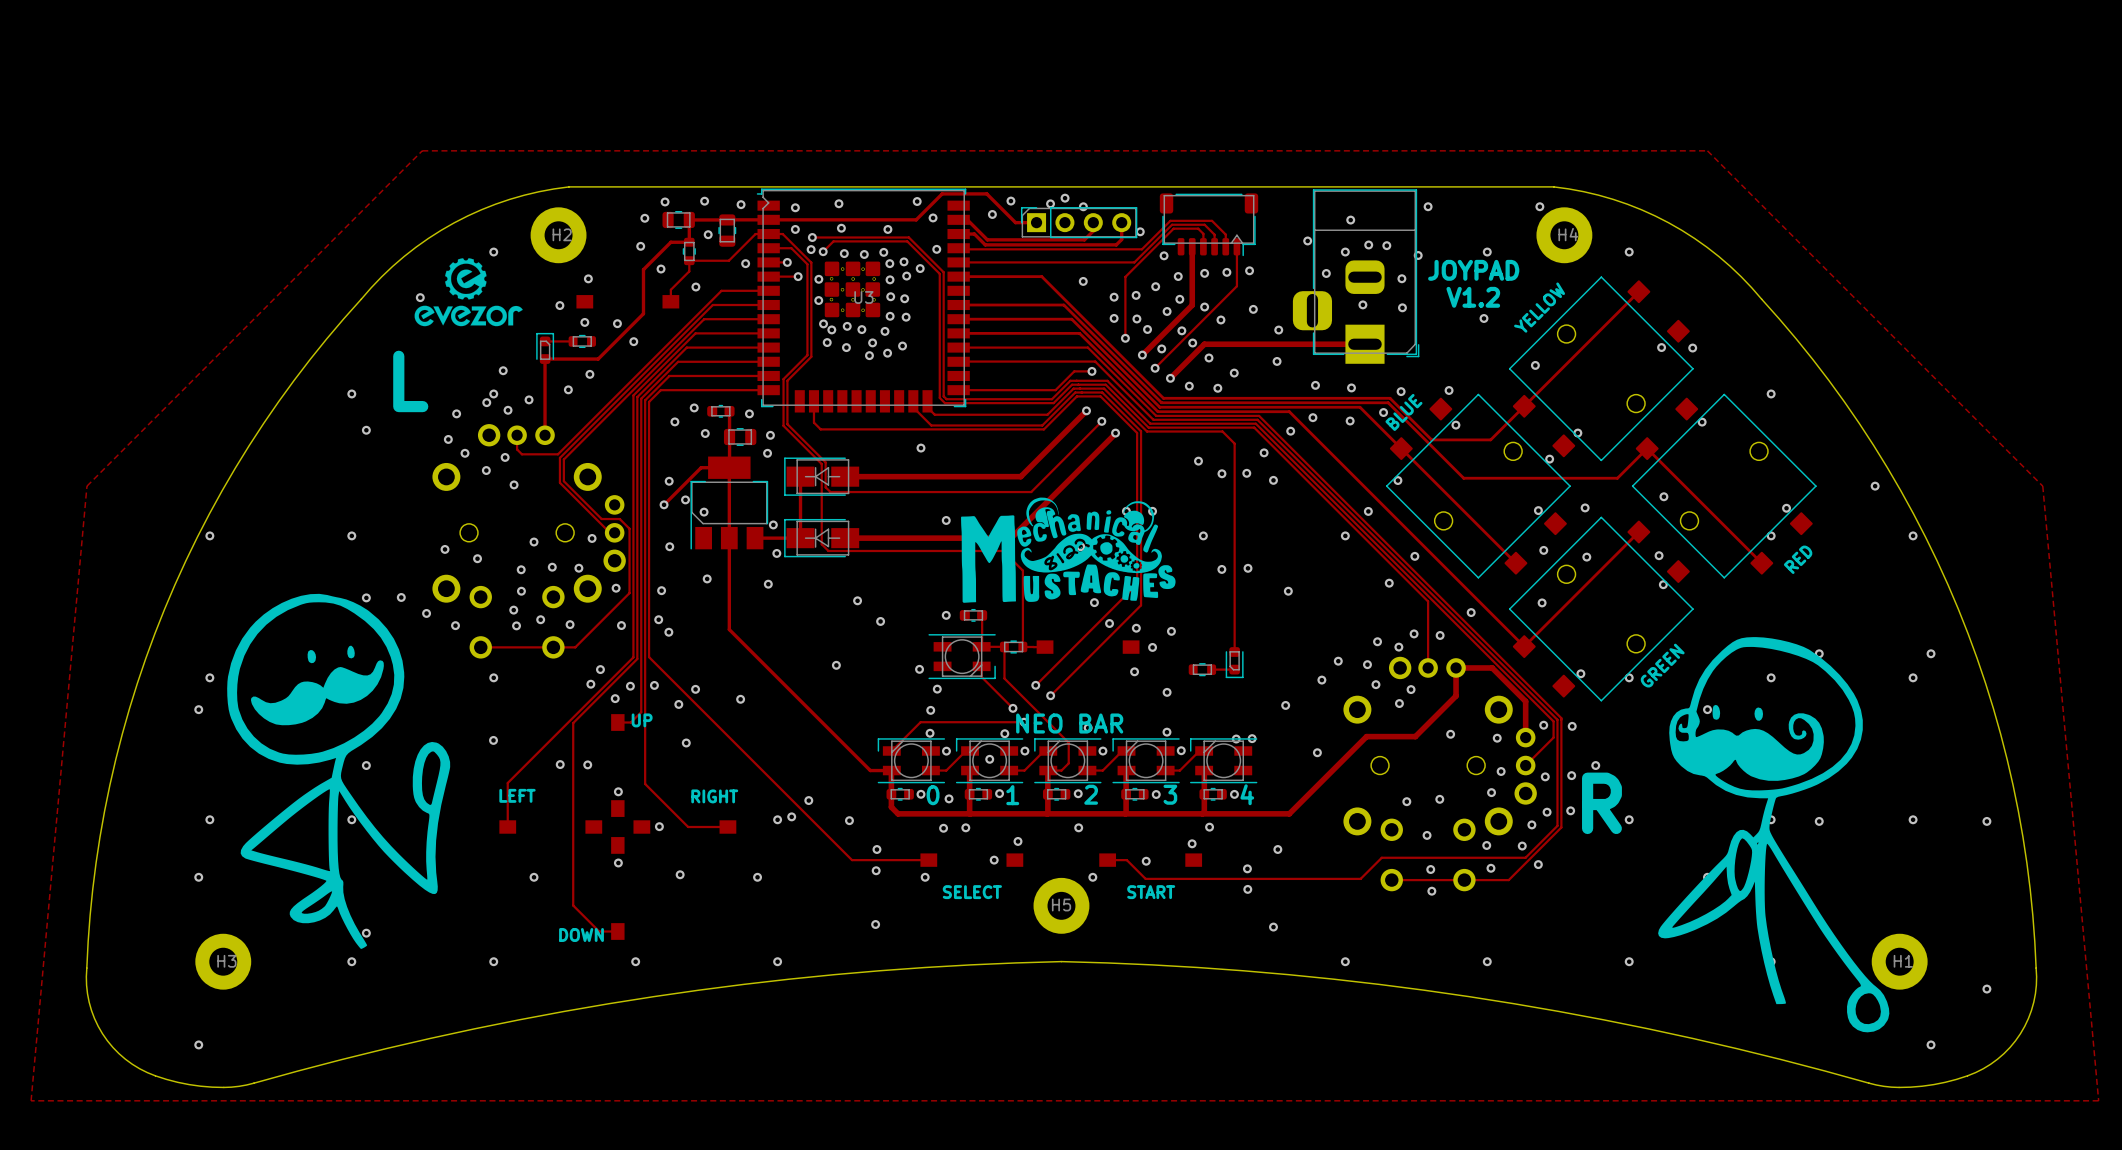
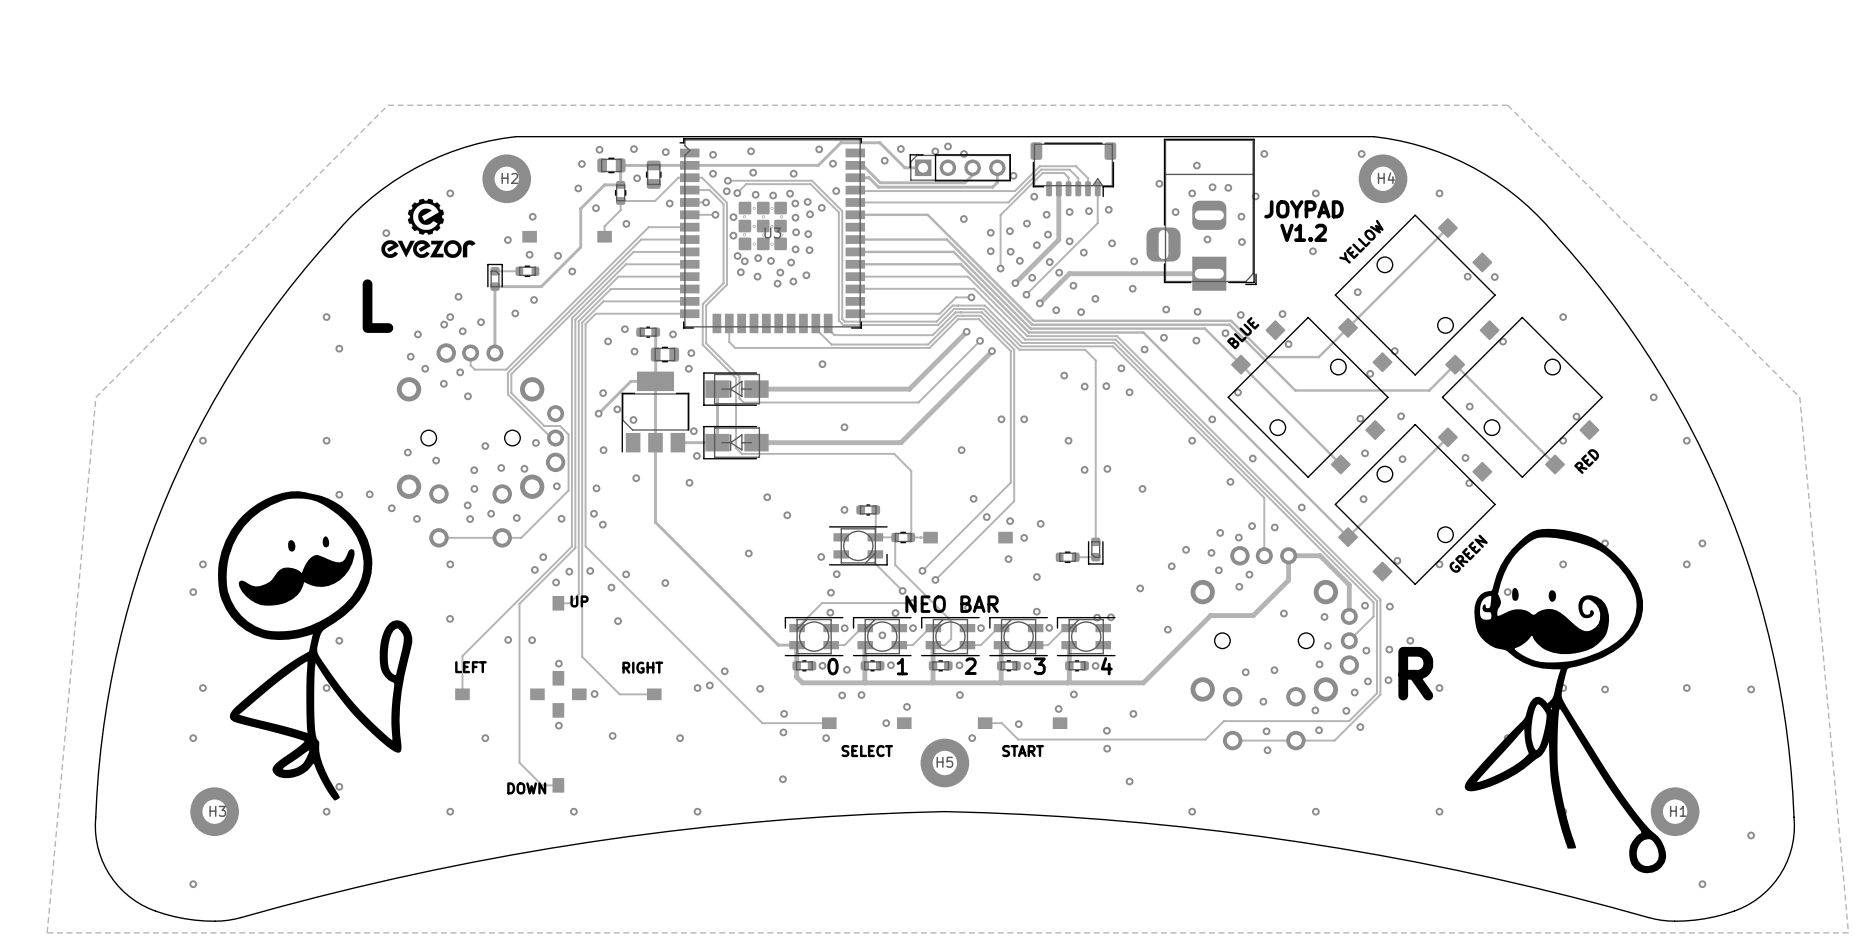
drawing: [961, 497, 1176, 603] -> none

